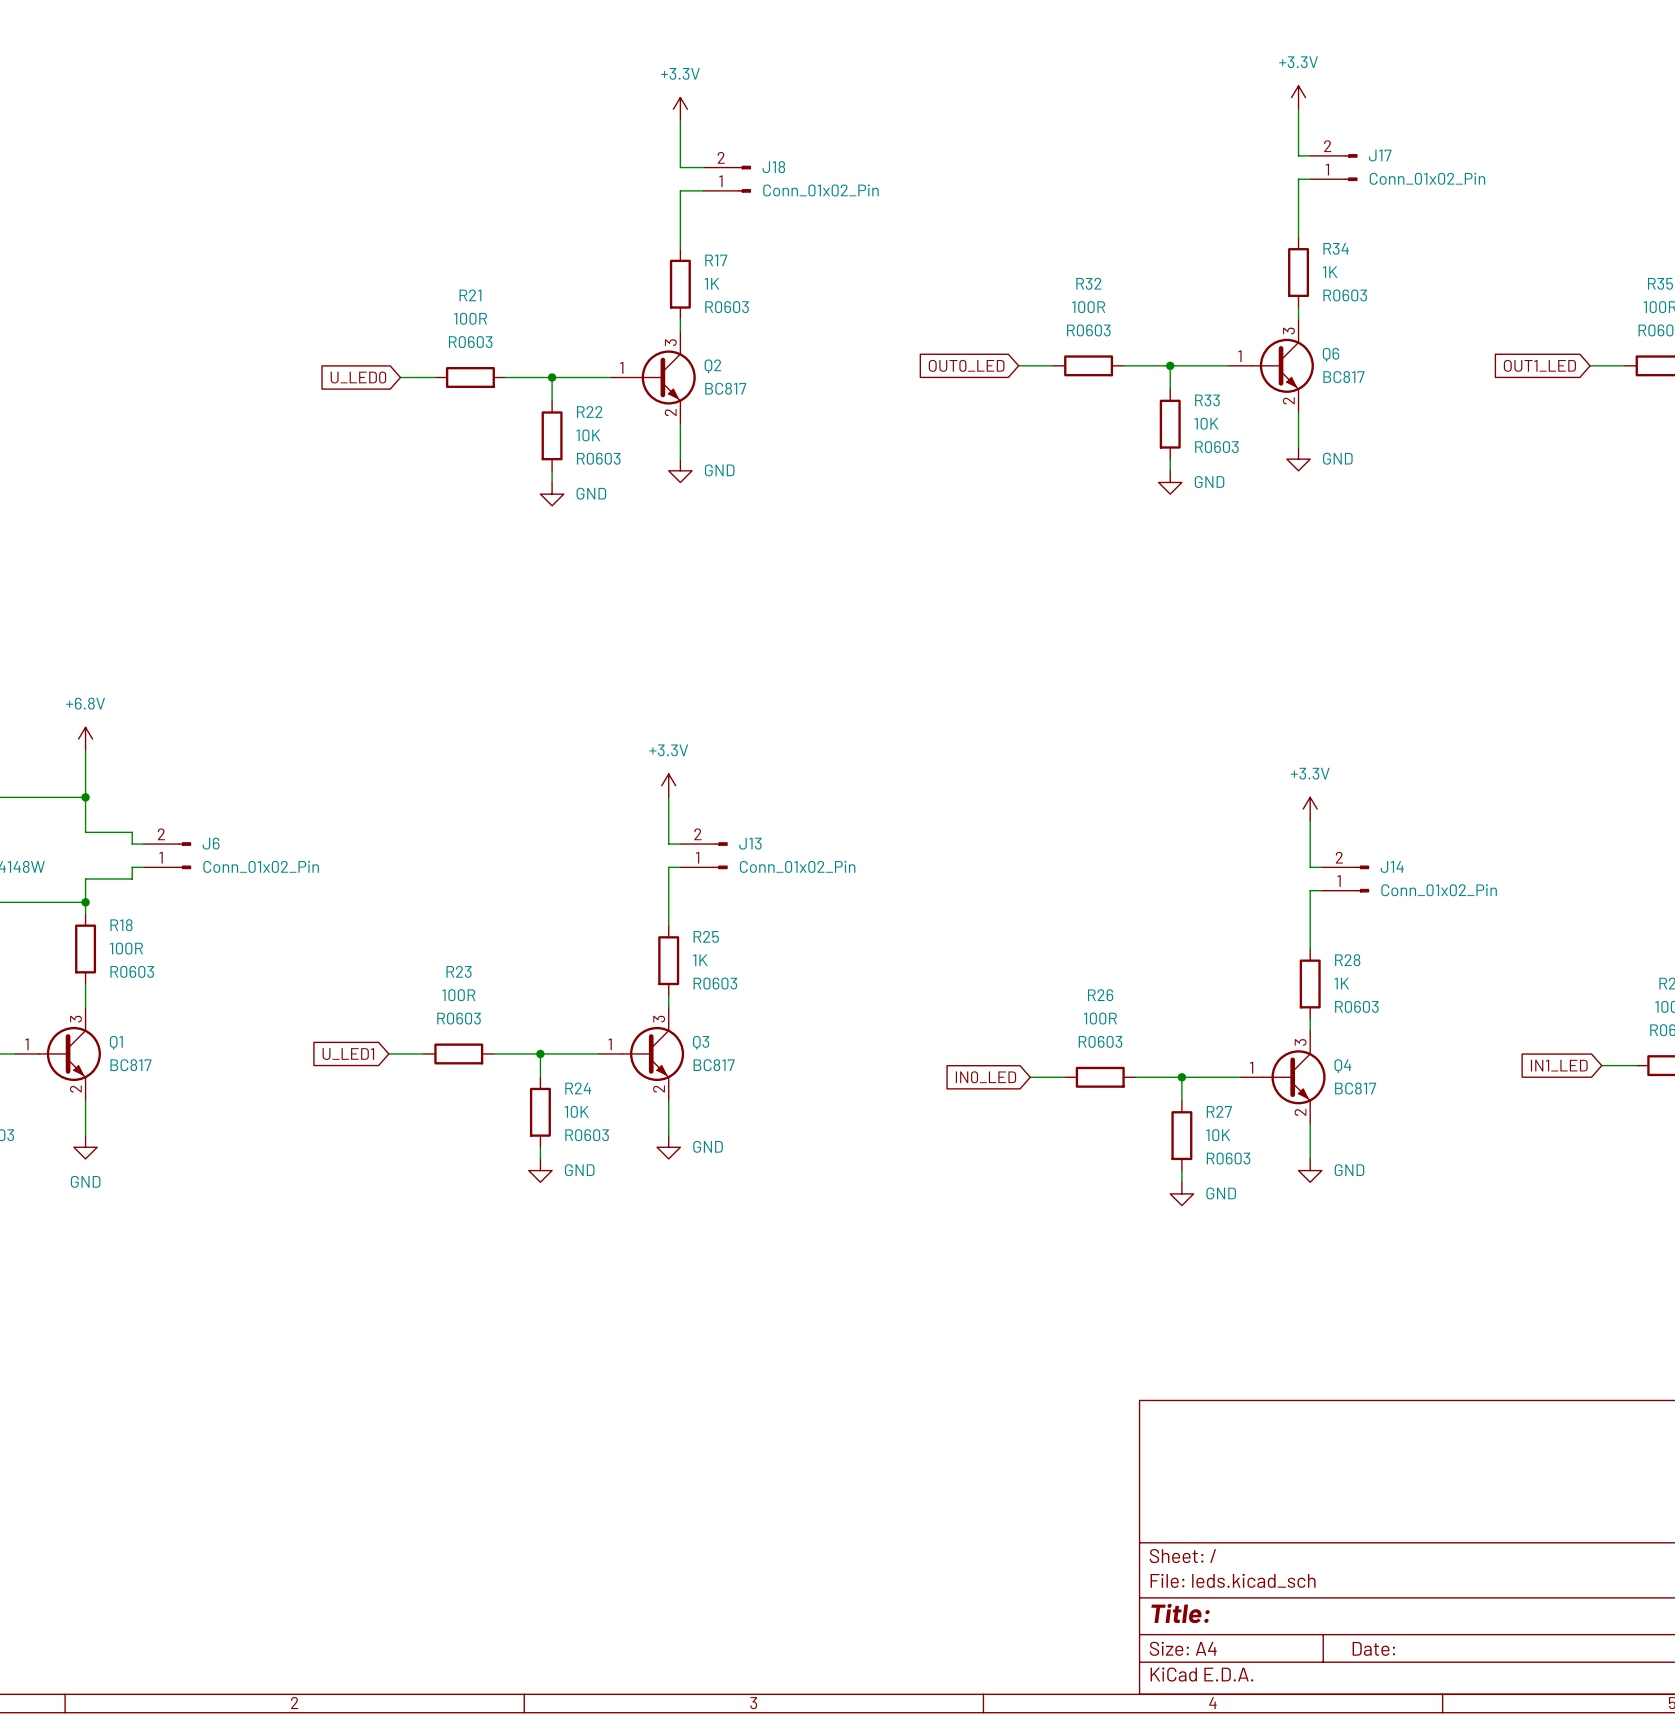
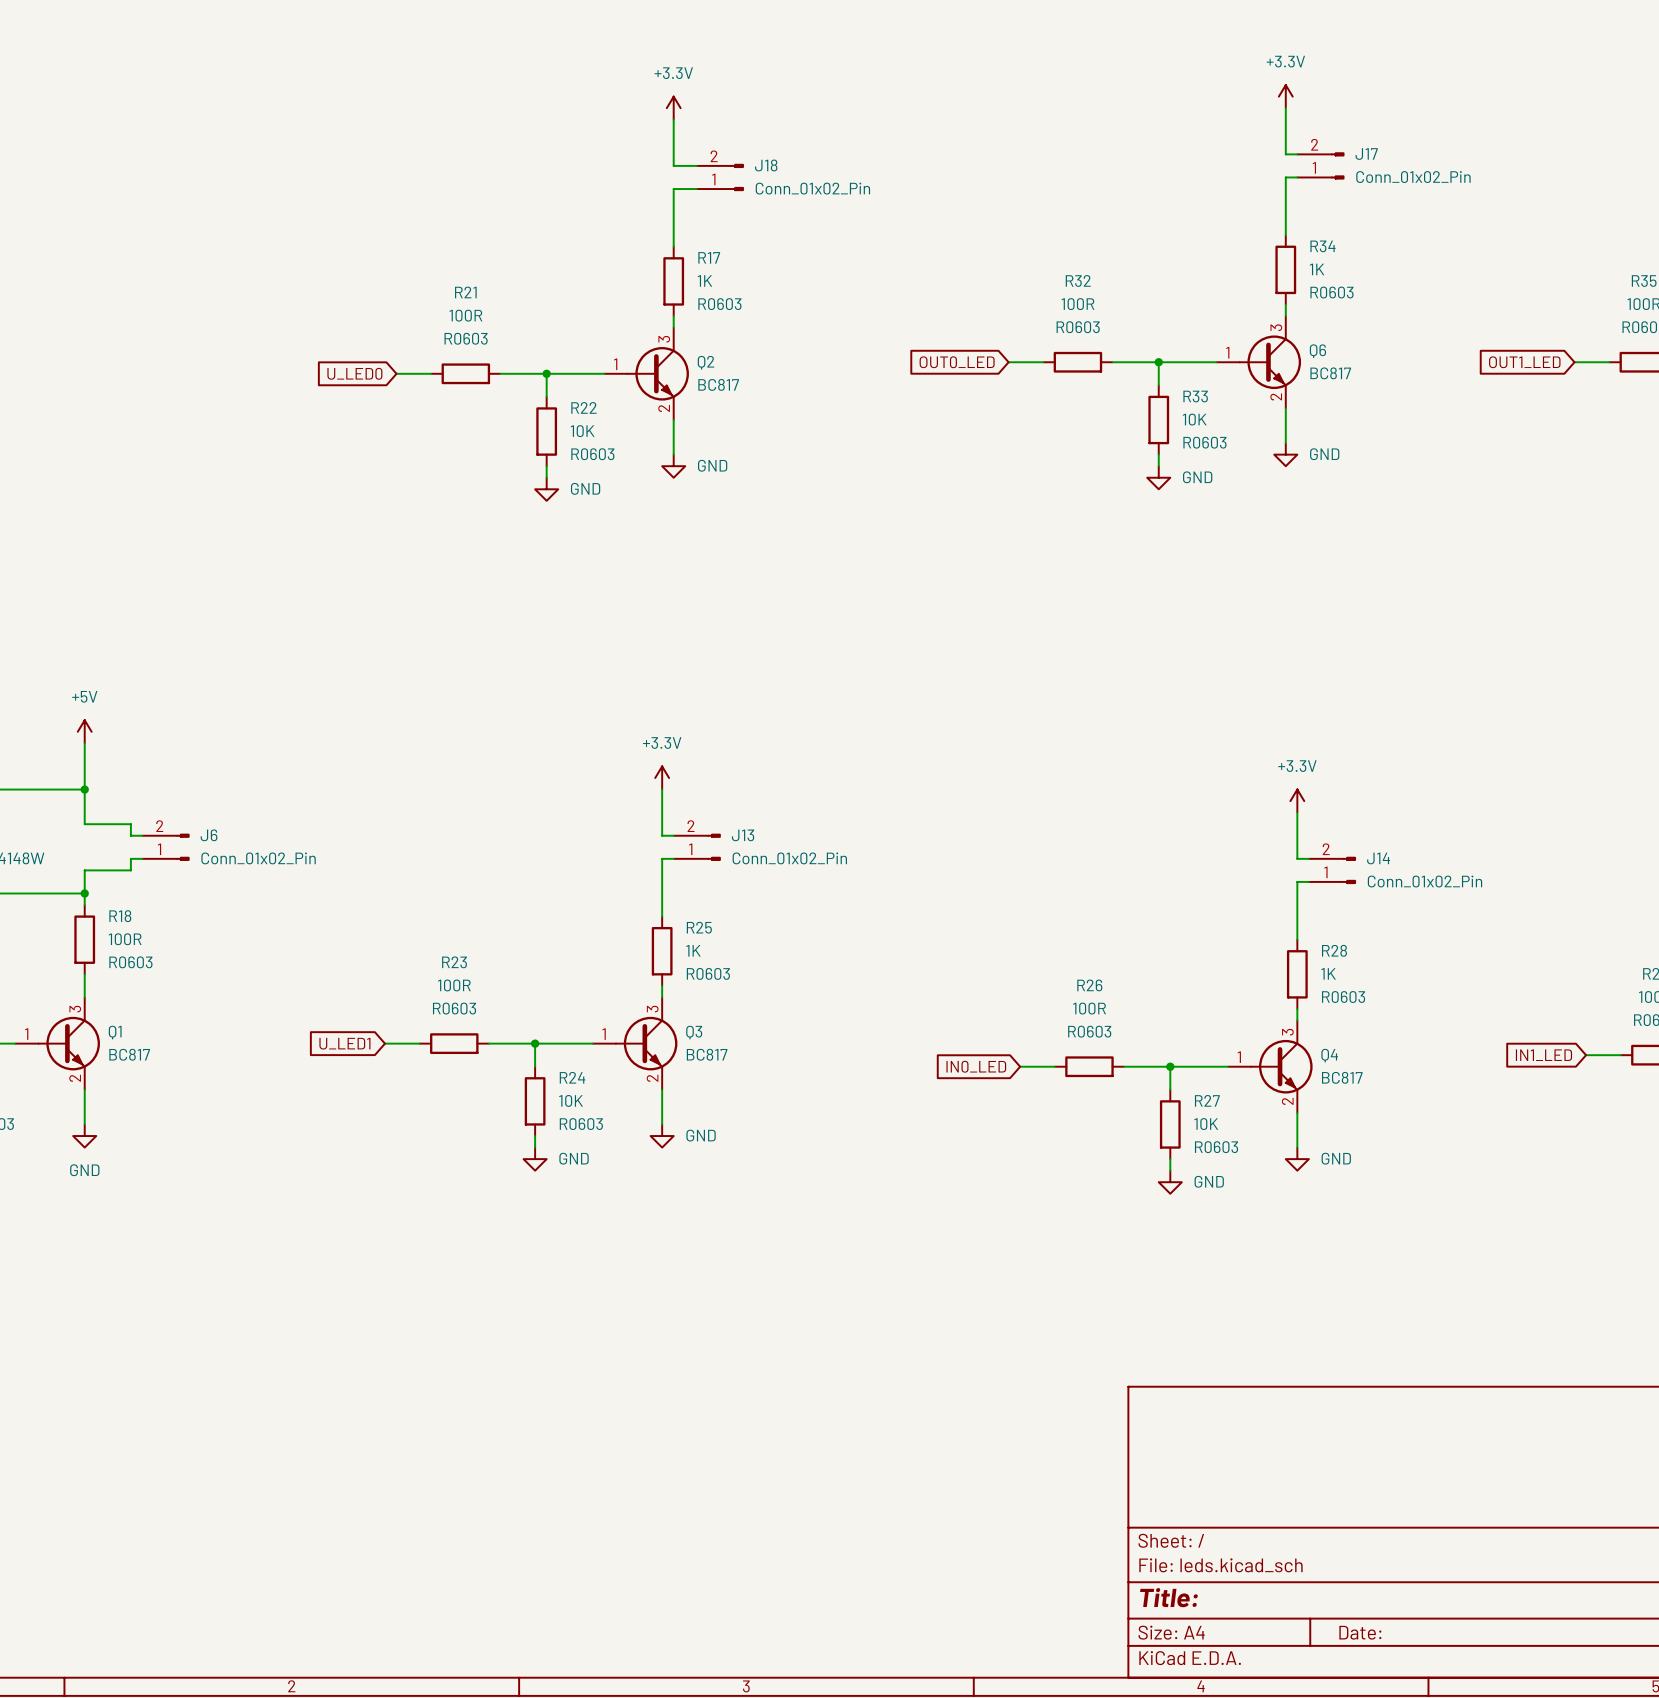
power symbol: +6.8V (85, 739) -> +5V (84, 731)

